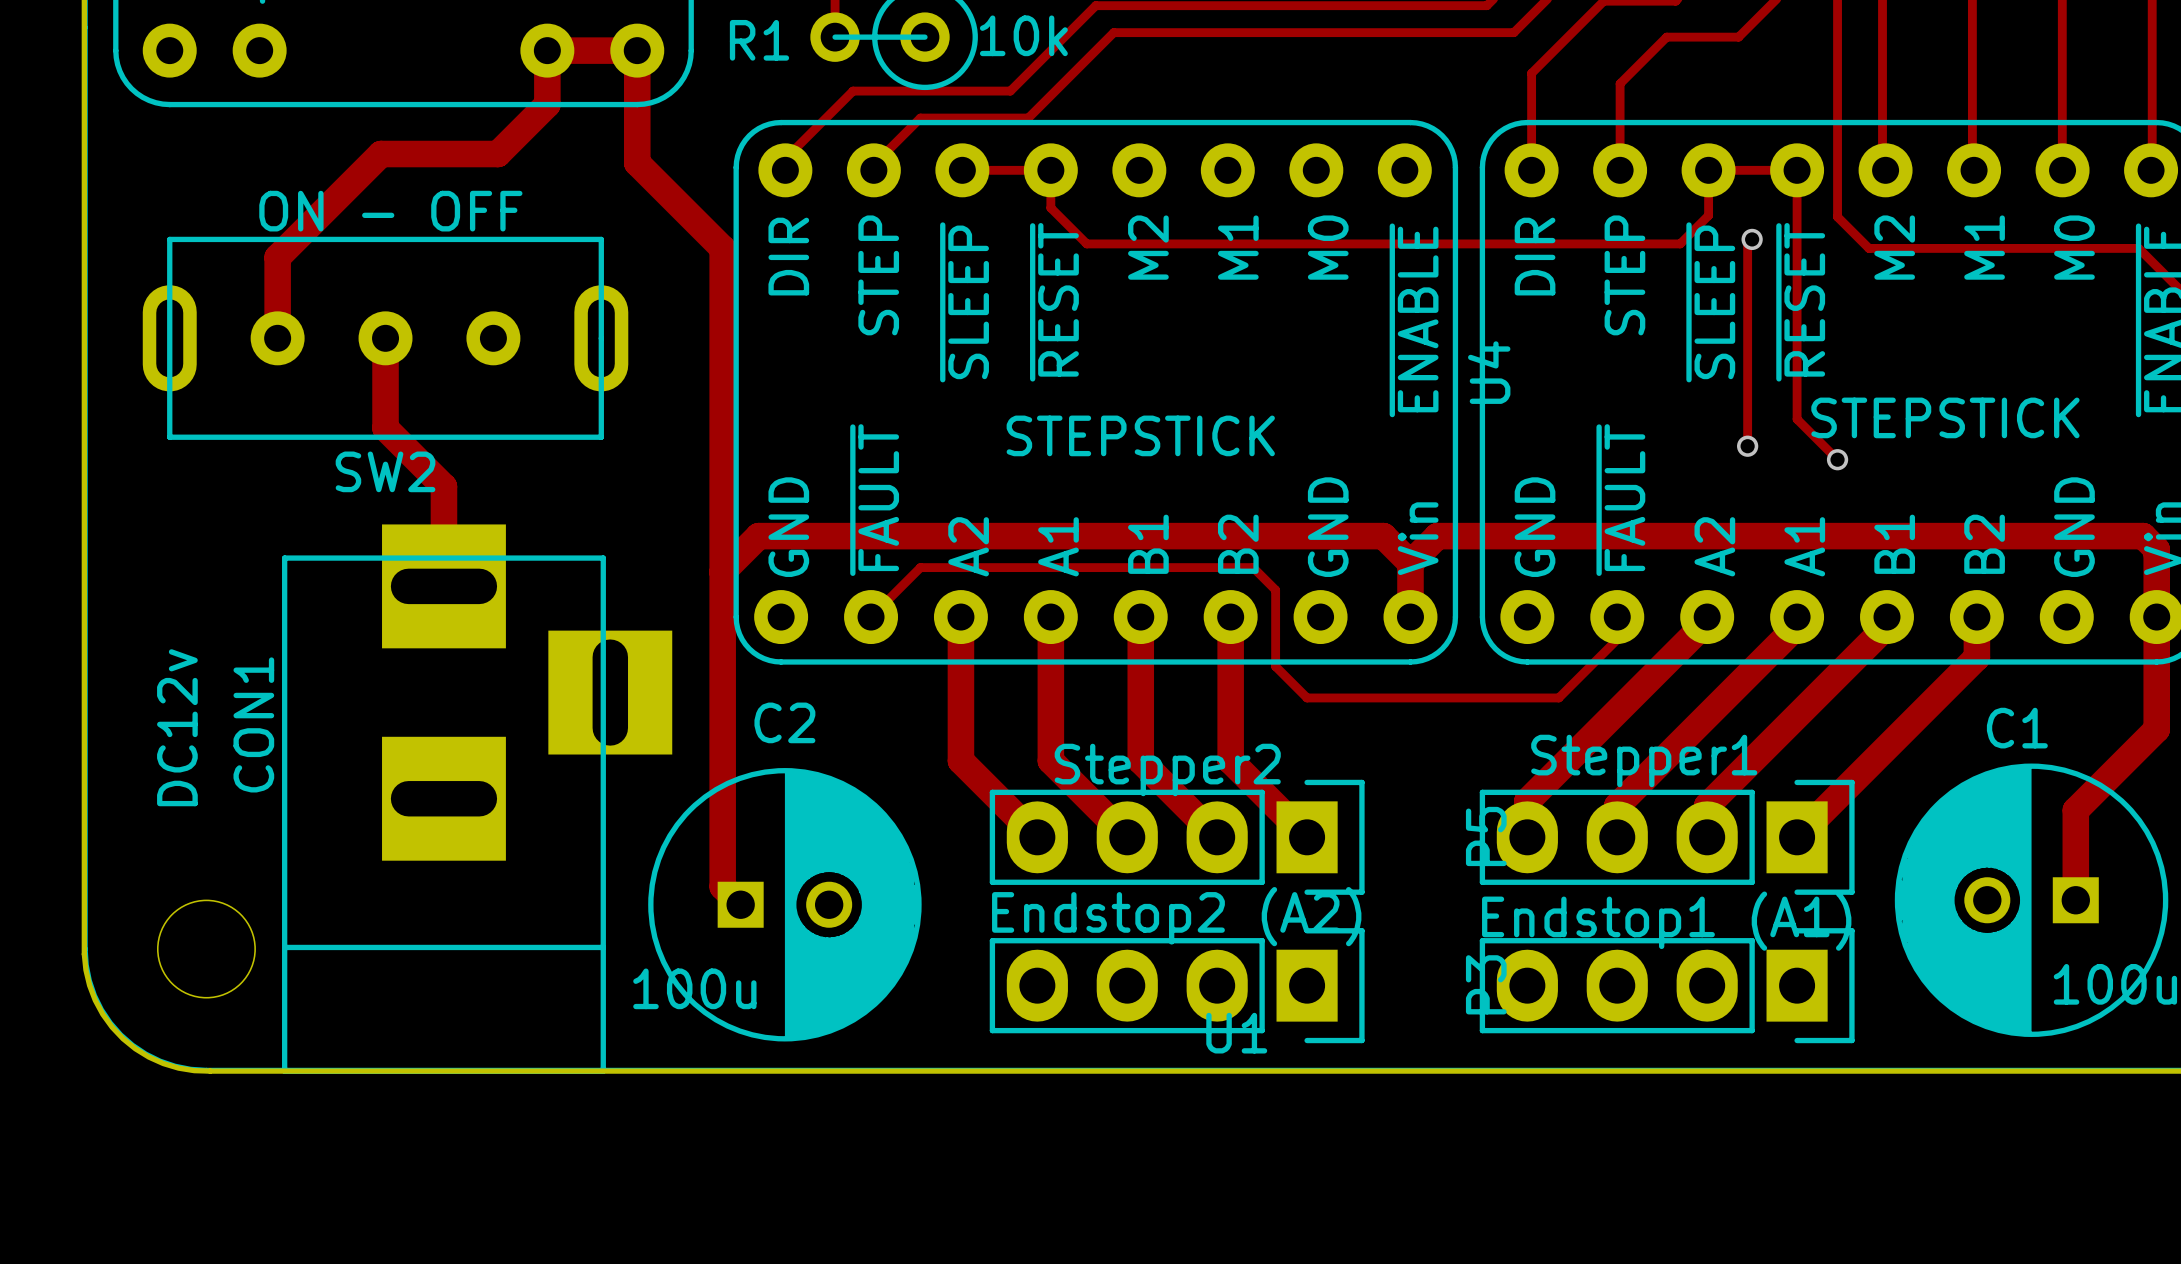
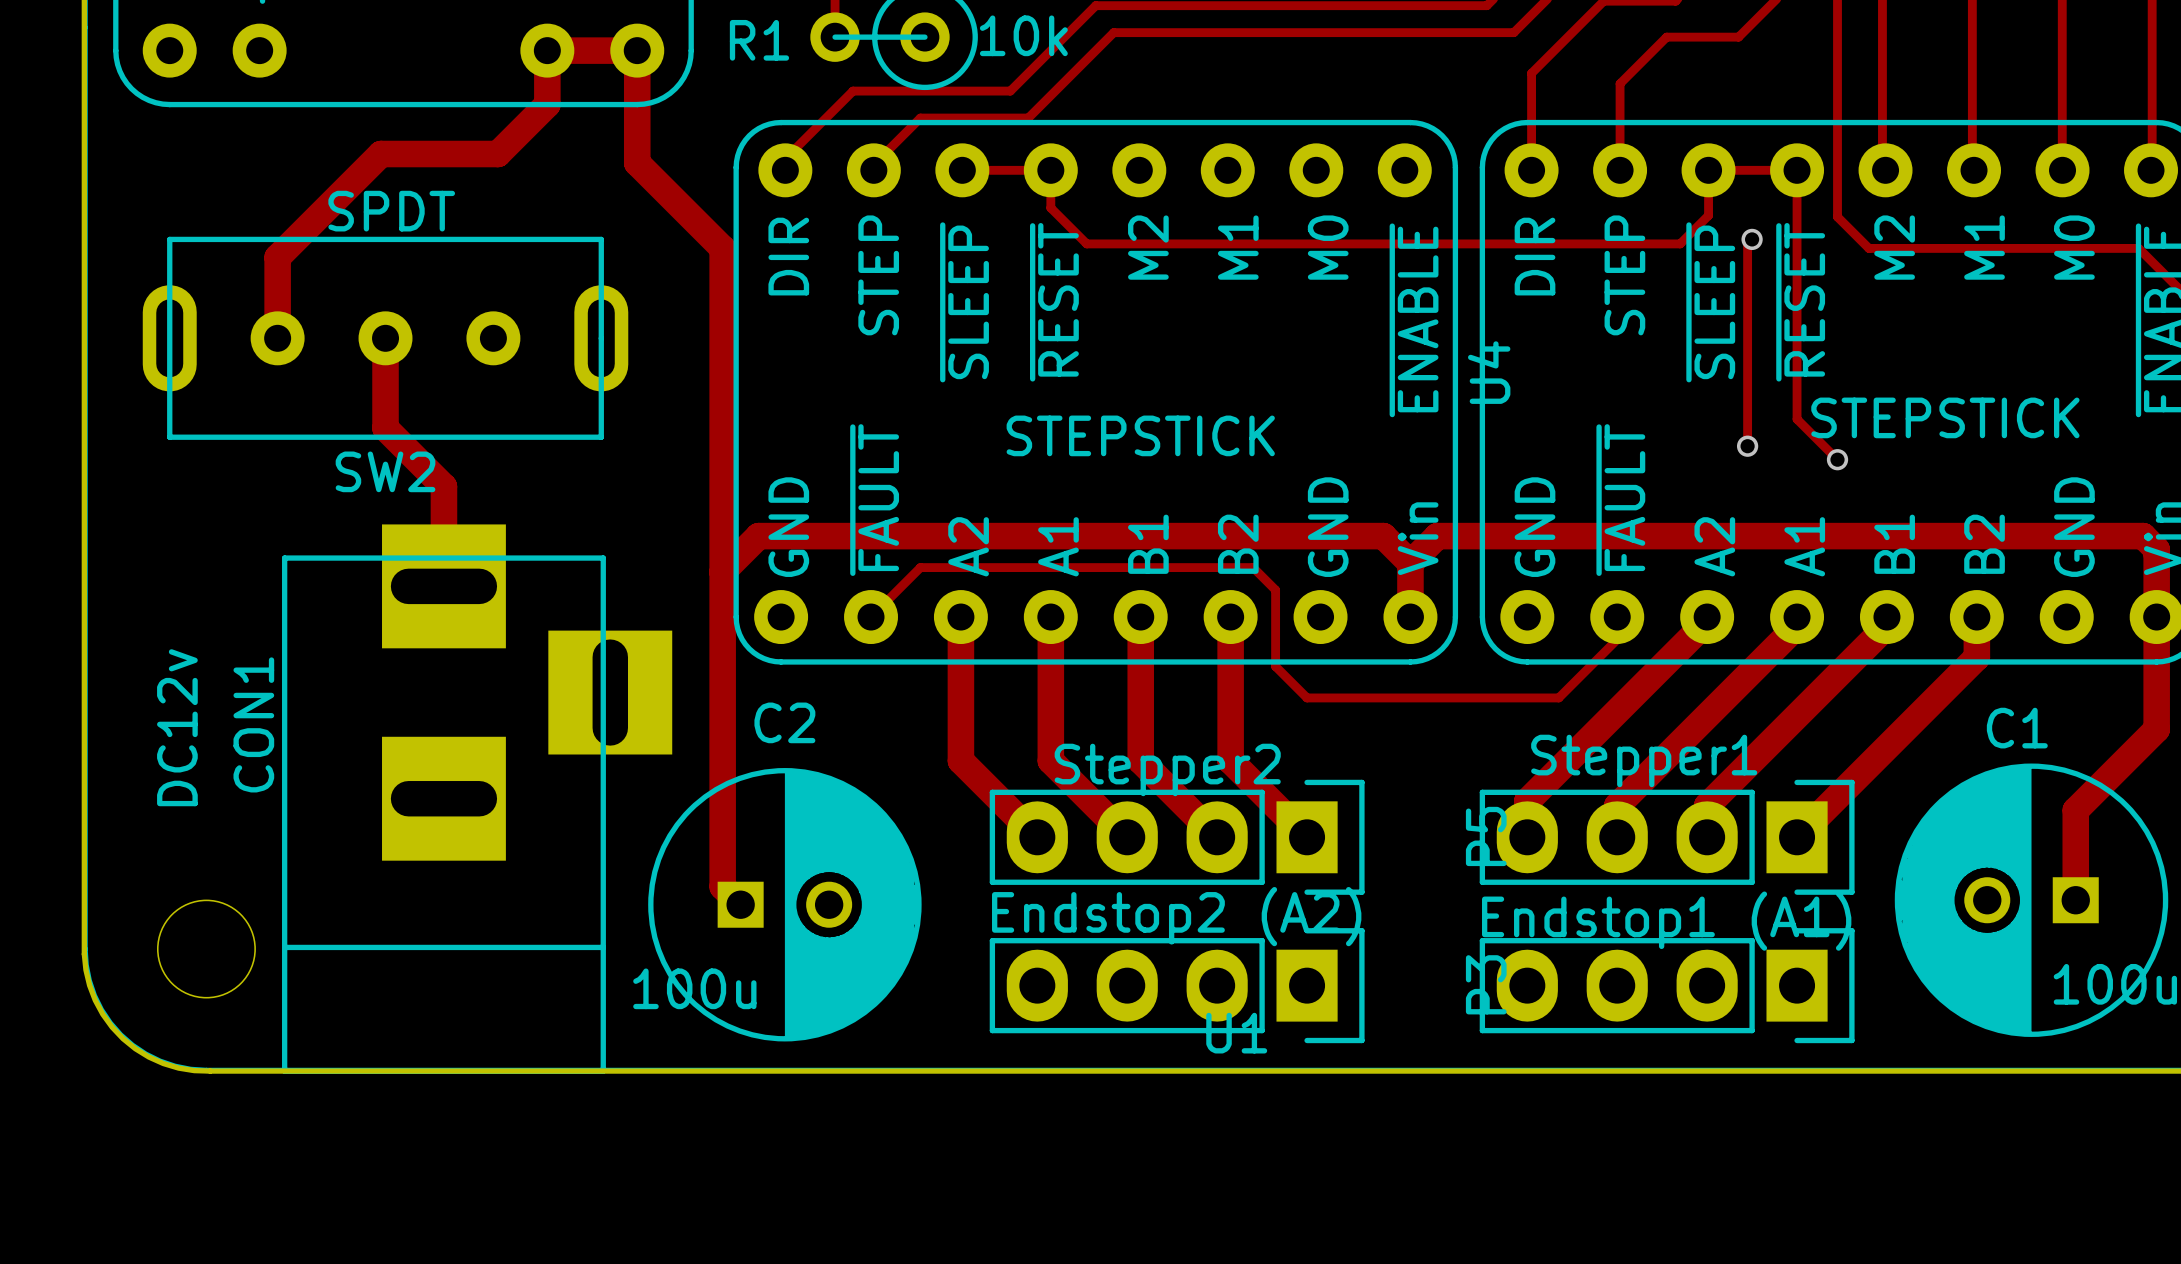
SW2 value: ON - OFF (390, 211) -> SPDT (391, 211)

